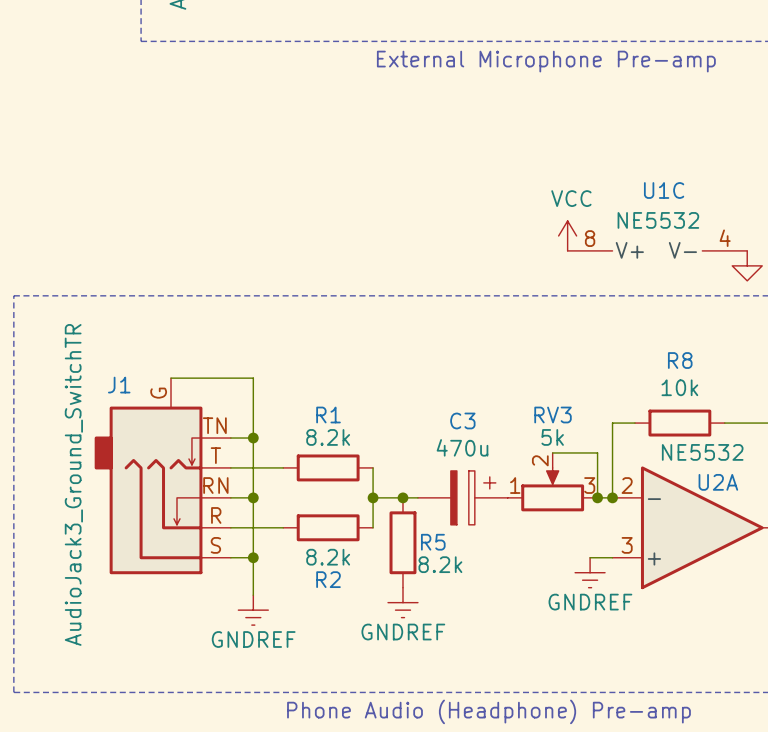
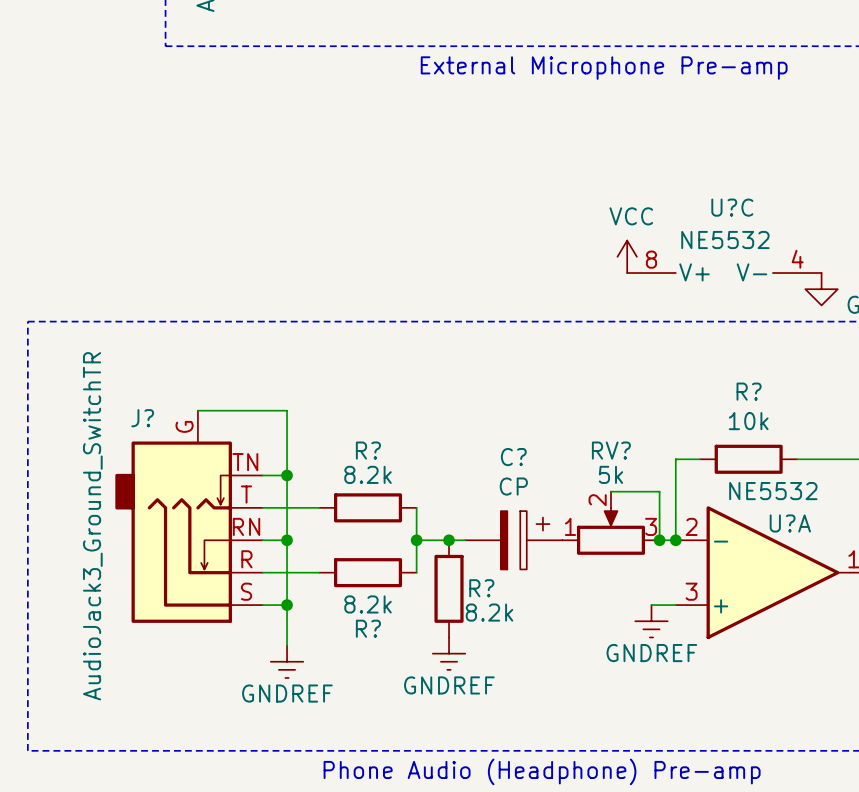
U1C name: U1C (664, 190) -> U?C (732, 207)
R8 name: R8 (680, 360) -> R? (749, 391)
J1 name: J1 (119, 385) -> J? (142, 418)
R1 name: R1 (328, 415) -> R? (368, 450)
RV3 name: RV3 (553, 415) -> RV? (611, 450)
C3 name: C3 (462, 420) -> C? (513, 457)
C3 value: 470u (462, 447) -> CP (513, 486)
U2A name: U2A (718, 482) -> U?A (790, 523)
R5 name: R5 (433, 542) -> R? (481, 588)
R2 name: R2 (328, 579) -> R? (368, 628)

